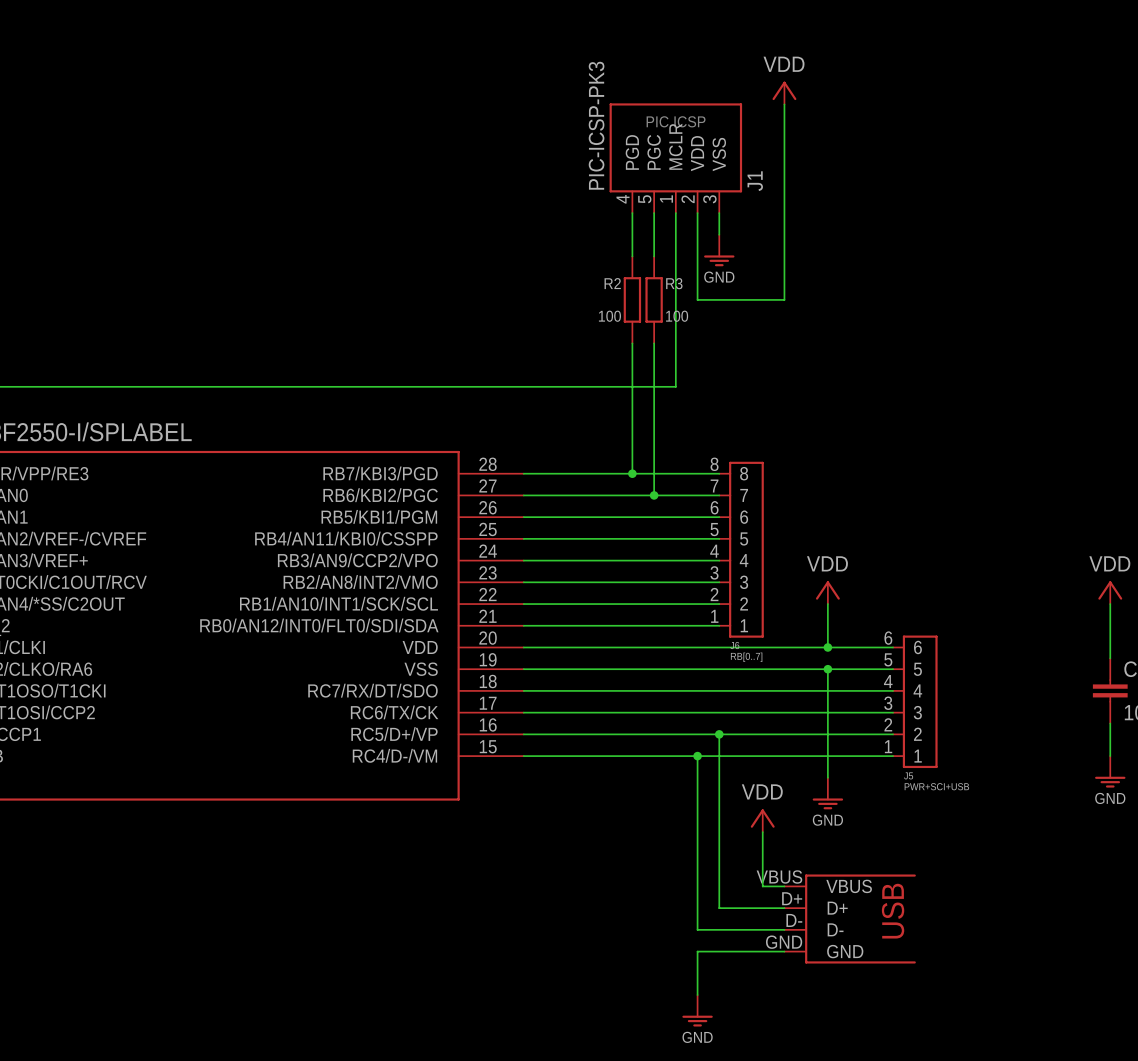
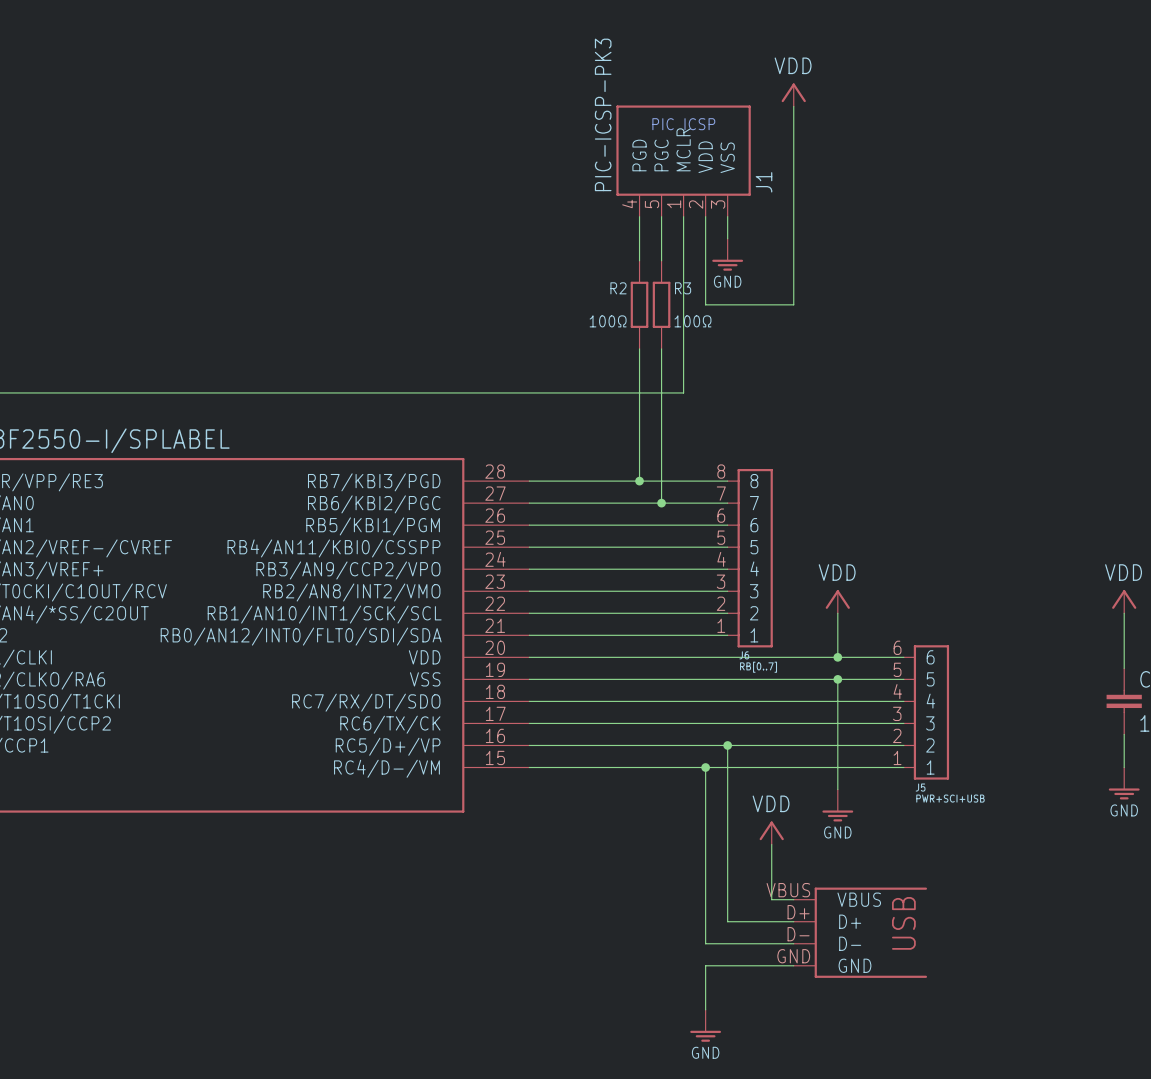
R2 value: 100 (609, 316) -> 100Ω (608, 321)
R3 value: 100 (677, 316) -> 100Ω (692, 321)

